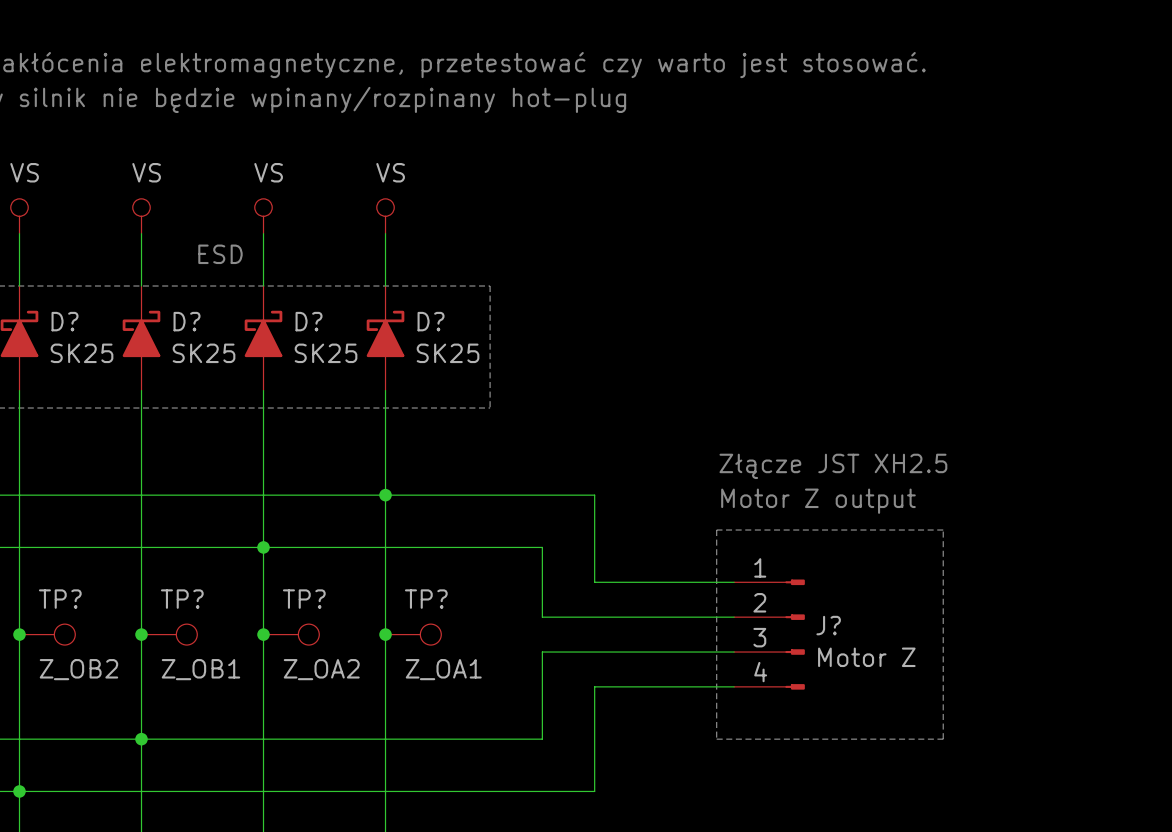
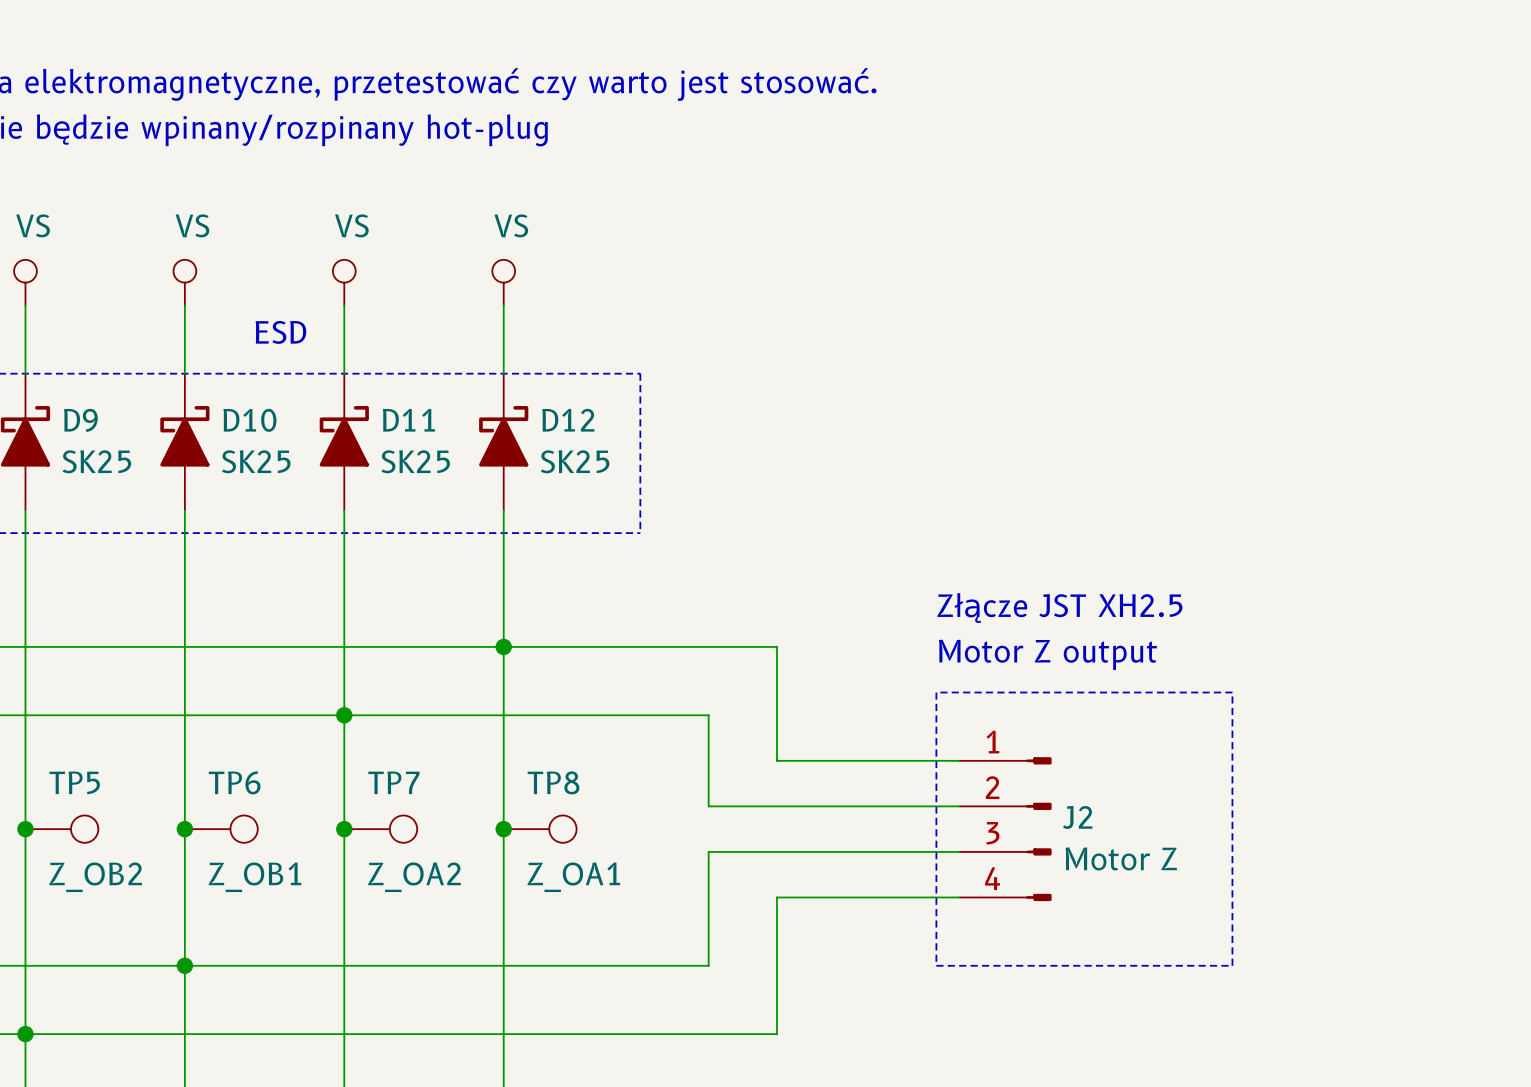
D? name: D? (65, 321) -> D9 (80, 420)
D? name: D? (187, 321) -> D10 (249, 420)
D? name: D? (309, 321) -> D11 (408, 420)
D? name: D? (431, 321) -> D12 (568, 420)
TP? name: TP? (60, 599) -> TP5 (74, 782)
TP? name: TP? (182, 599) -> TP6 (234, 782)
TP? name: TP? (304, 599) -> TP7 (393, 782)
TP? name: TP? (426, 599) -> TP8 (553, 782)
J? name: J? (828, 625) -> J2 (1077, 817)

